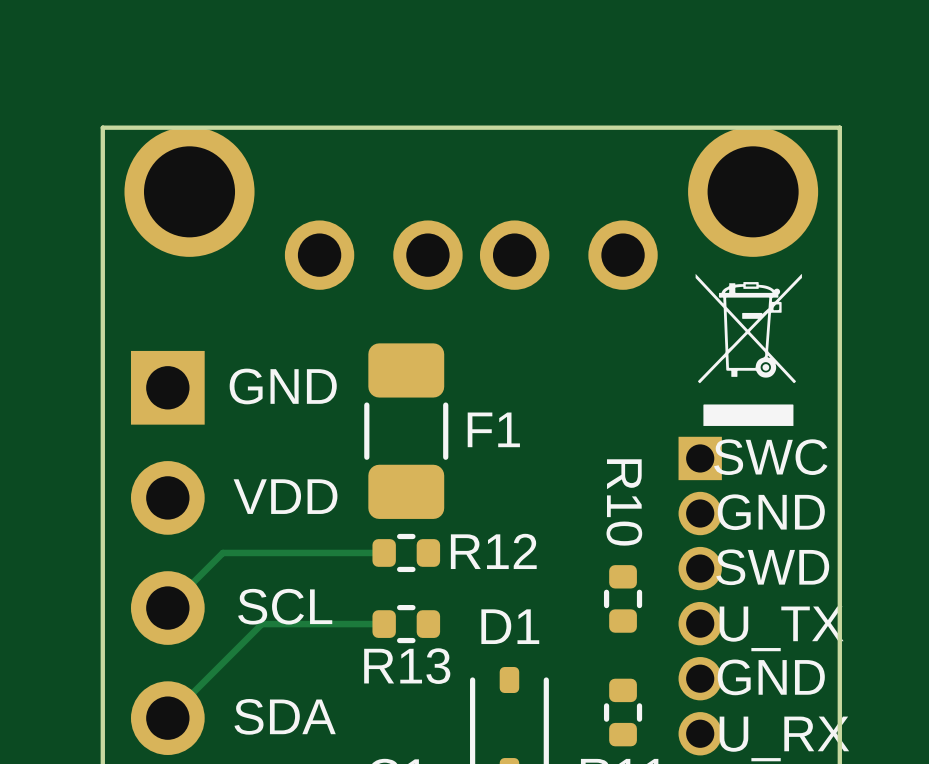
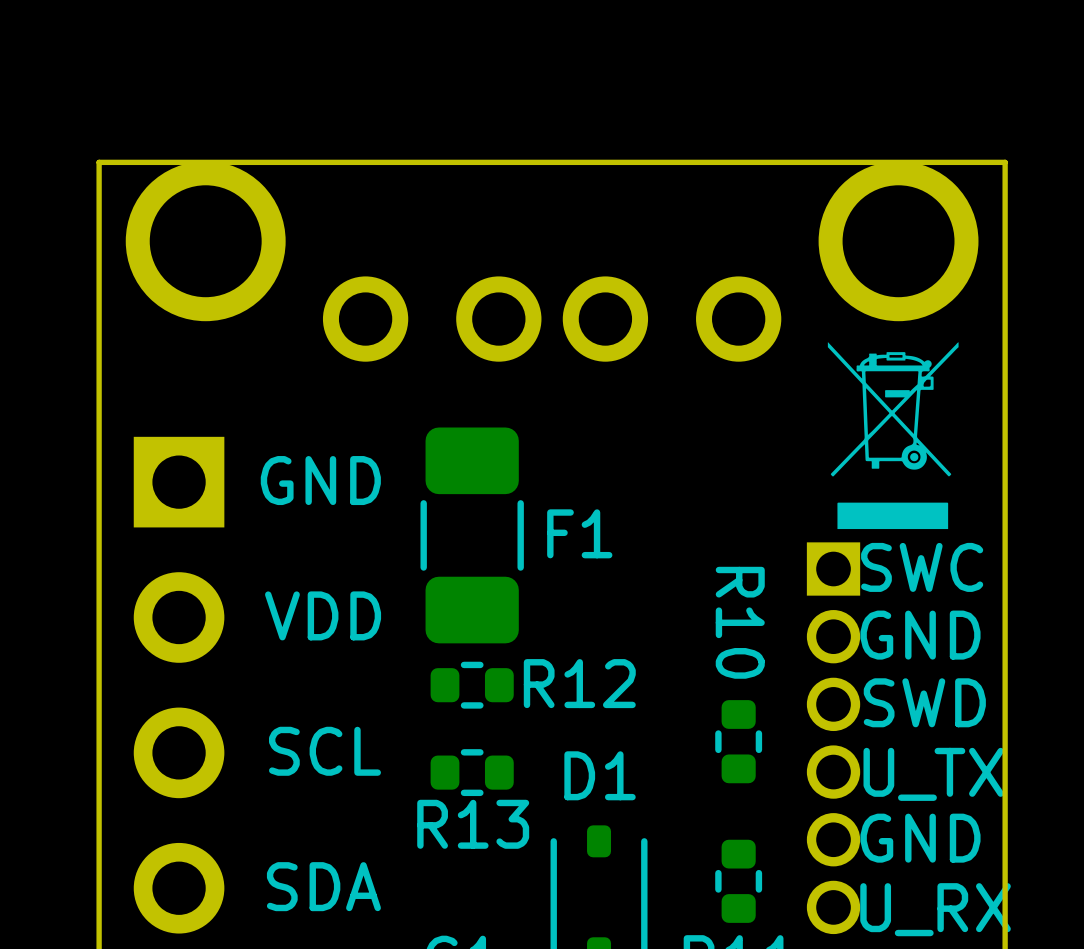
track: (384, 552) (222, 552) (167, 608) -> none
track: (384, 624) (261, 624) (167, 718) -> none

